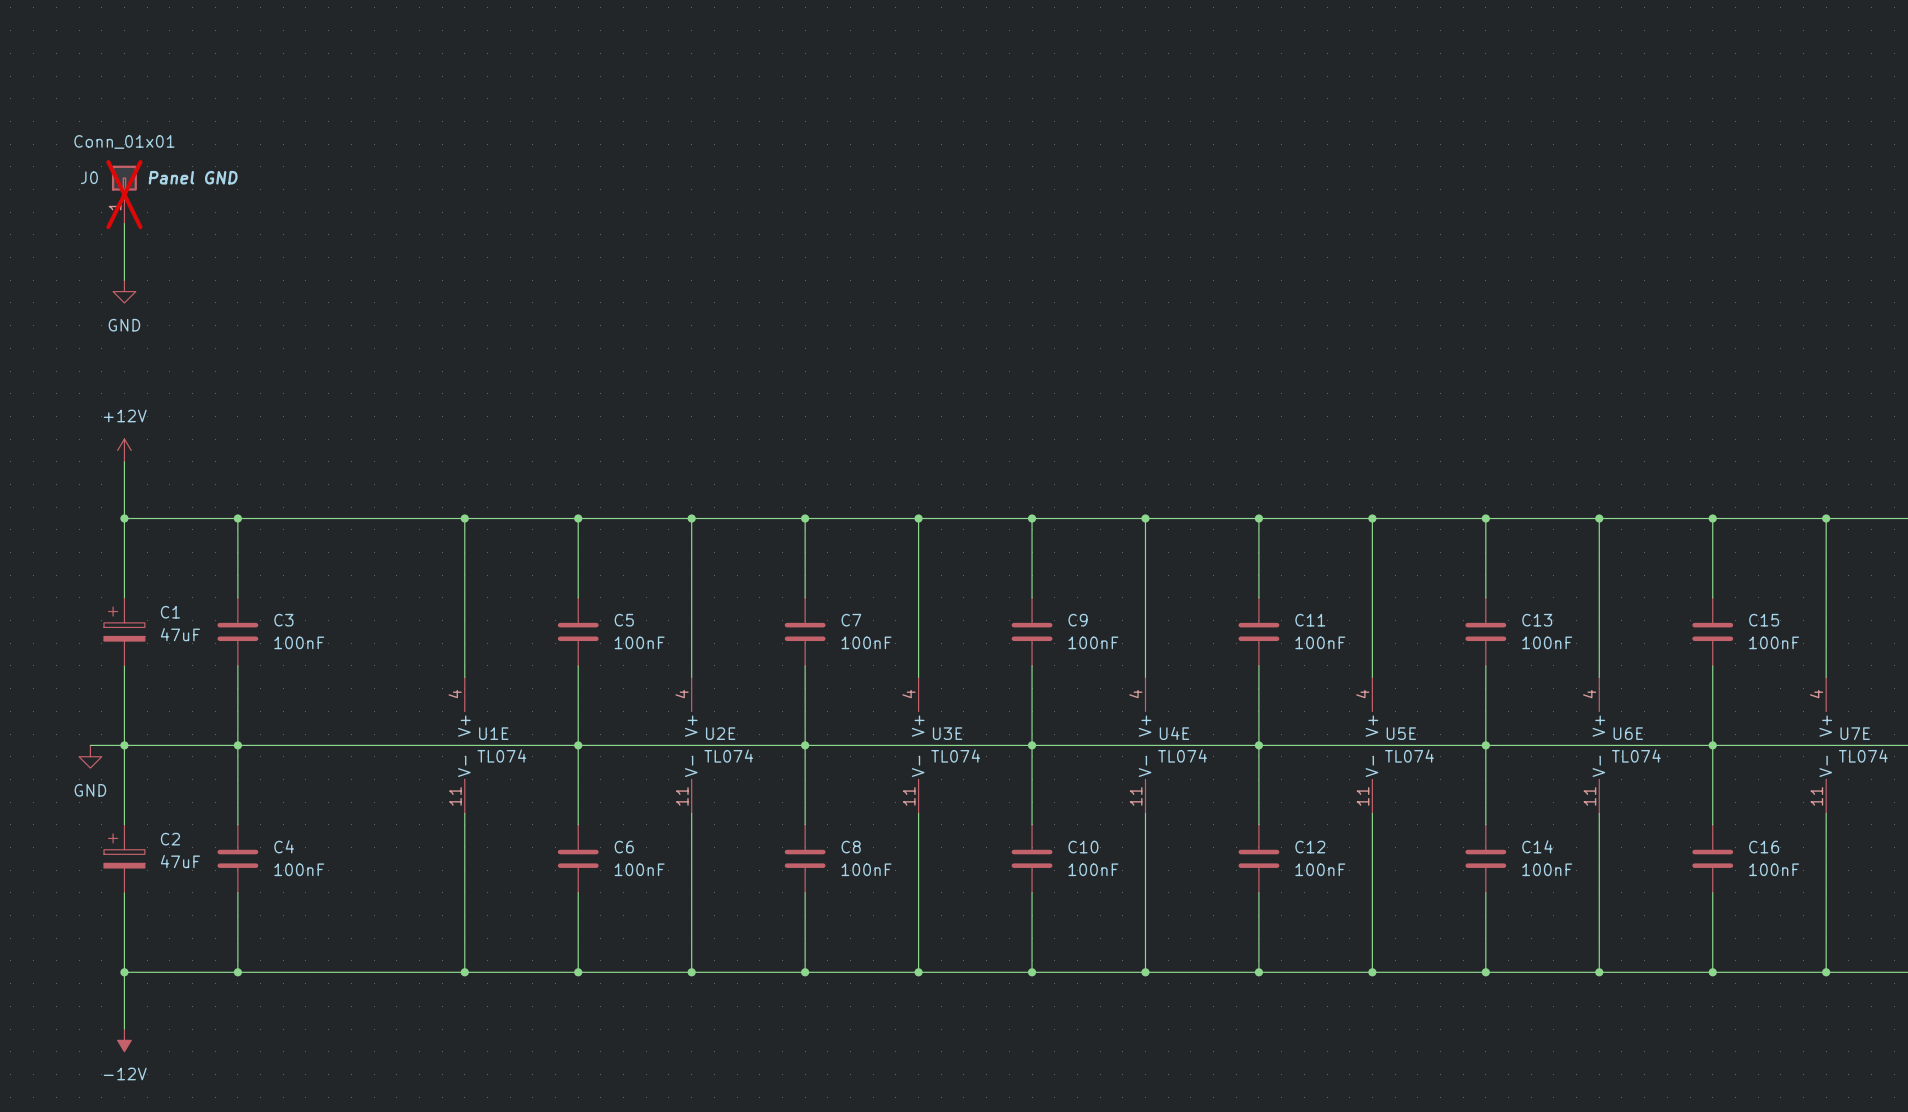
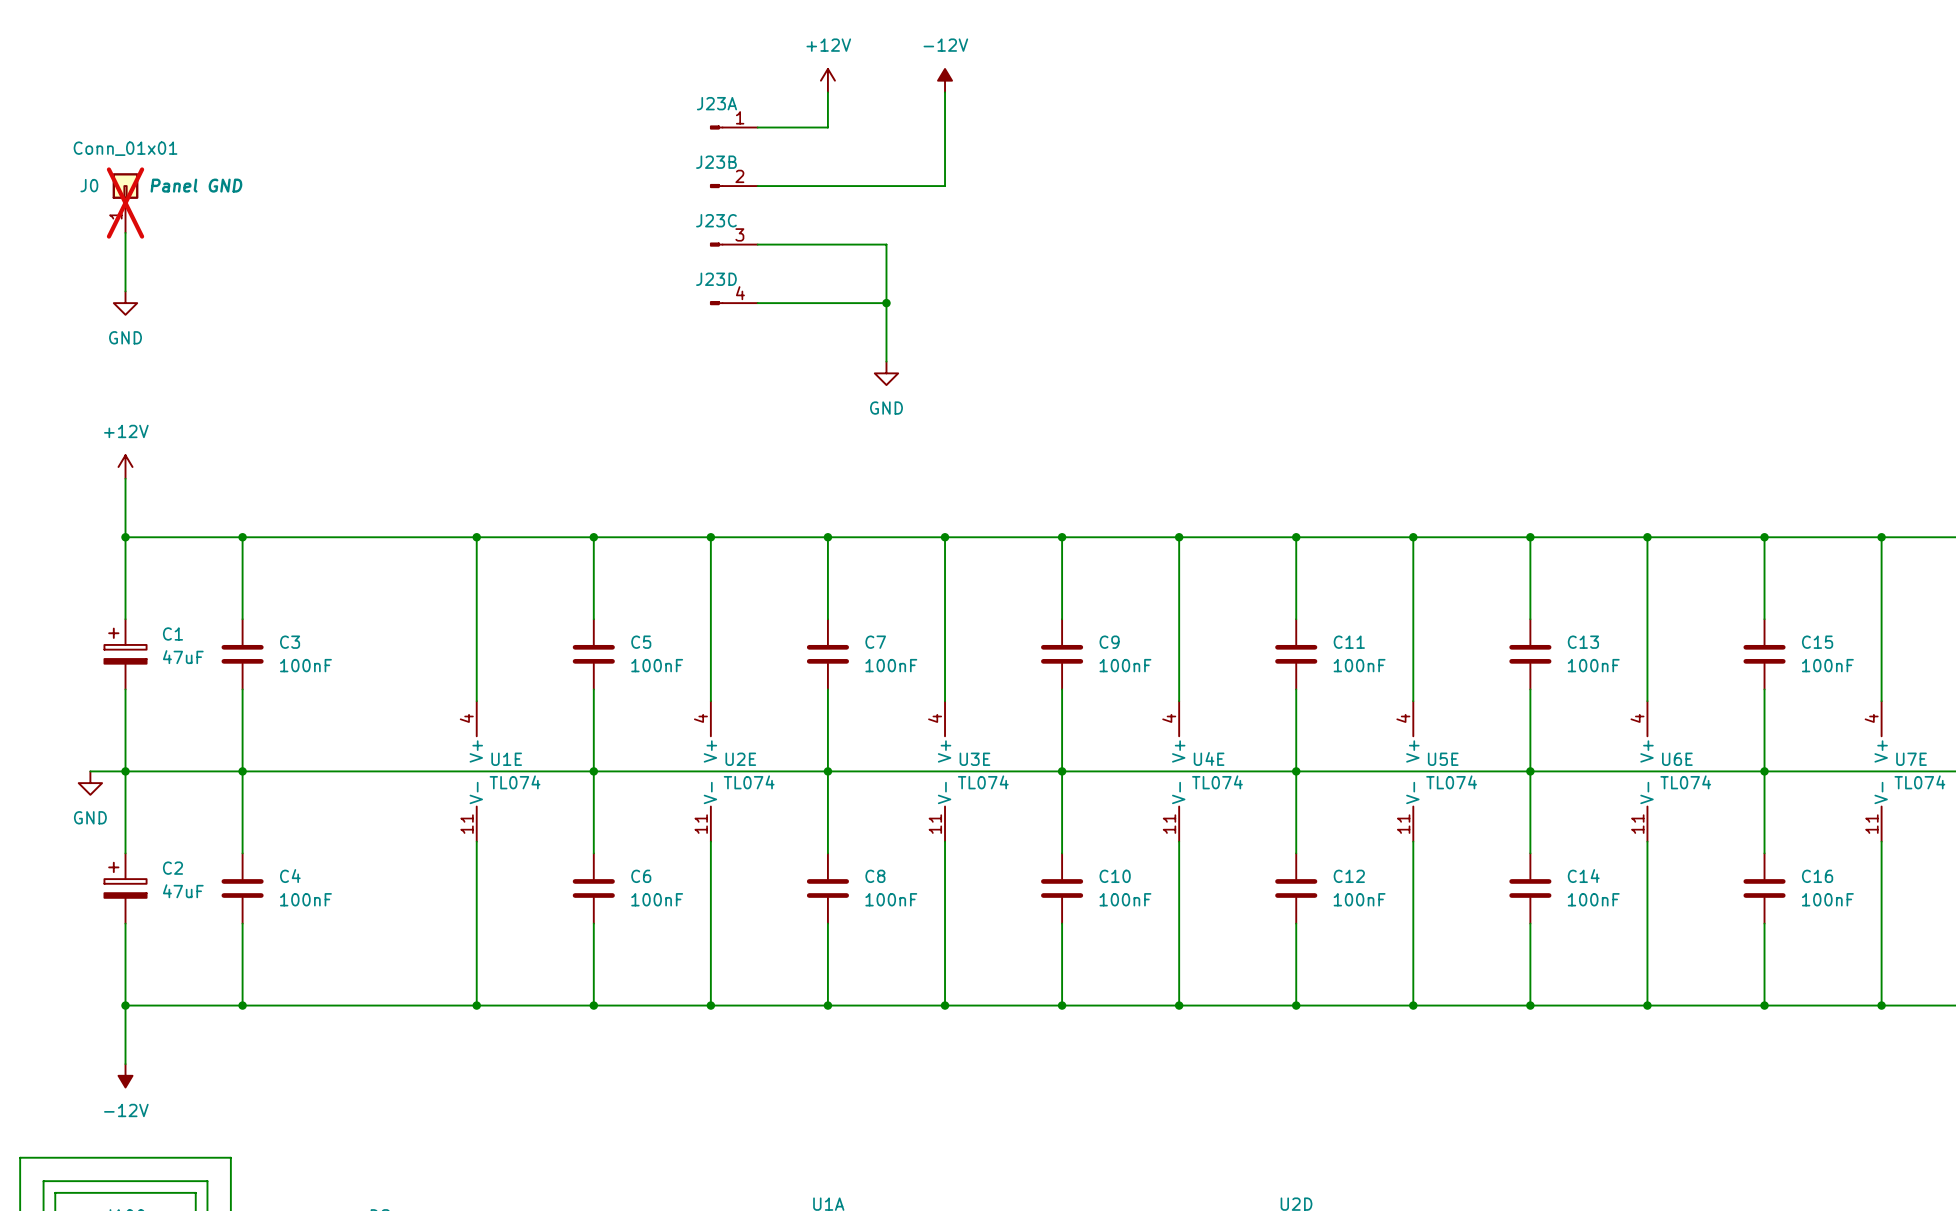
power symbol: none -> +12V (827, 80)
power symbol: none -> -12V (945, 80)
wire: none -> (827, 92) (827, 127) (757, 127)
wire: none -> (945, 92) (945, 186) (757, 186)
J23A: none -> (733, 127)
J23B: none -> (733, 186)
J23C: none -> (733, 244)
wire: none -> (757, 244) (886, 244) (886, 361)
J23D: none -> (733, 303)
wire: none -> (757, 303) (886, 303)
junction: none -> (886, 303)
power symbol: none -> GND (886, 373)

